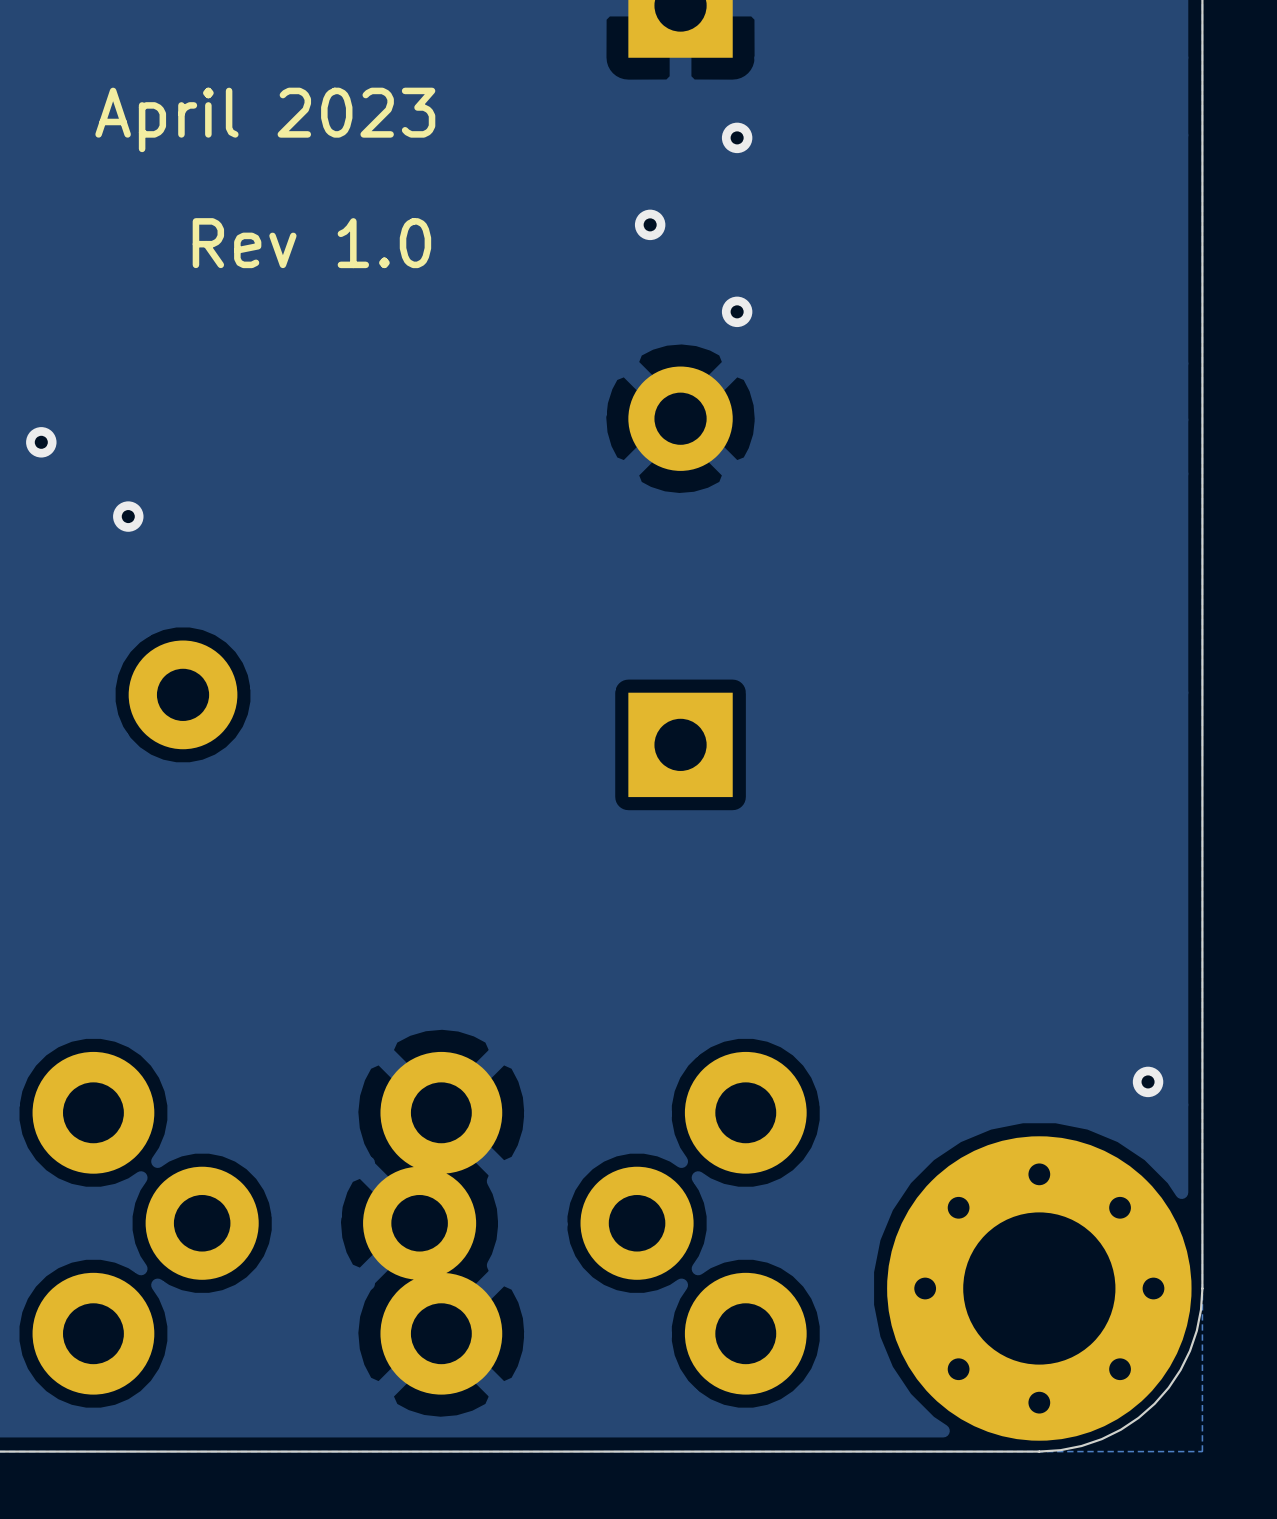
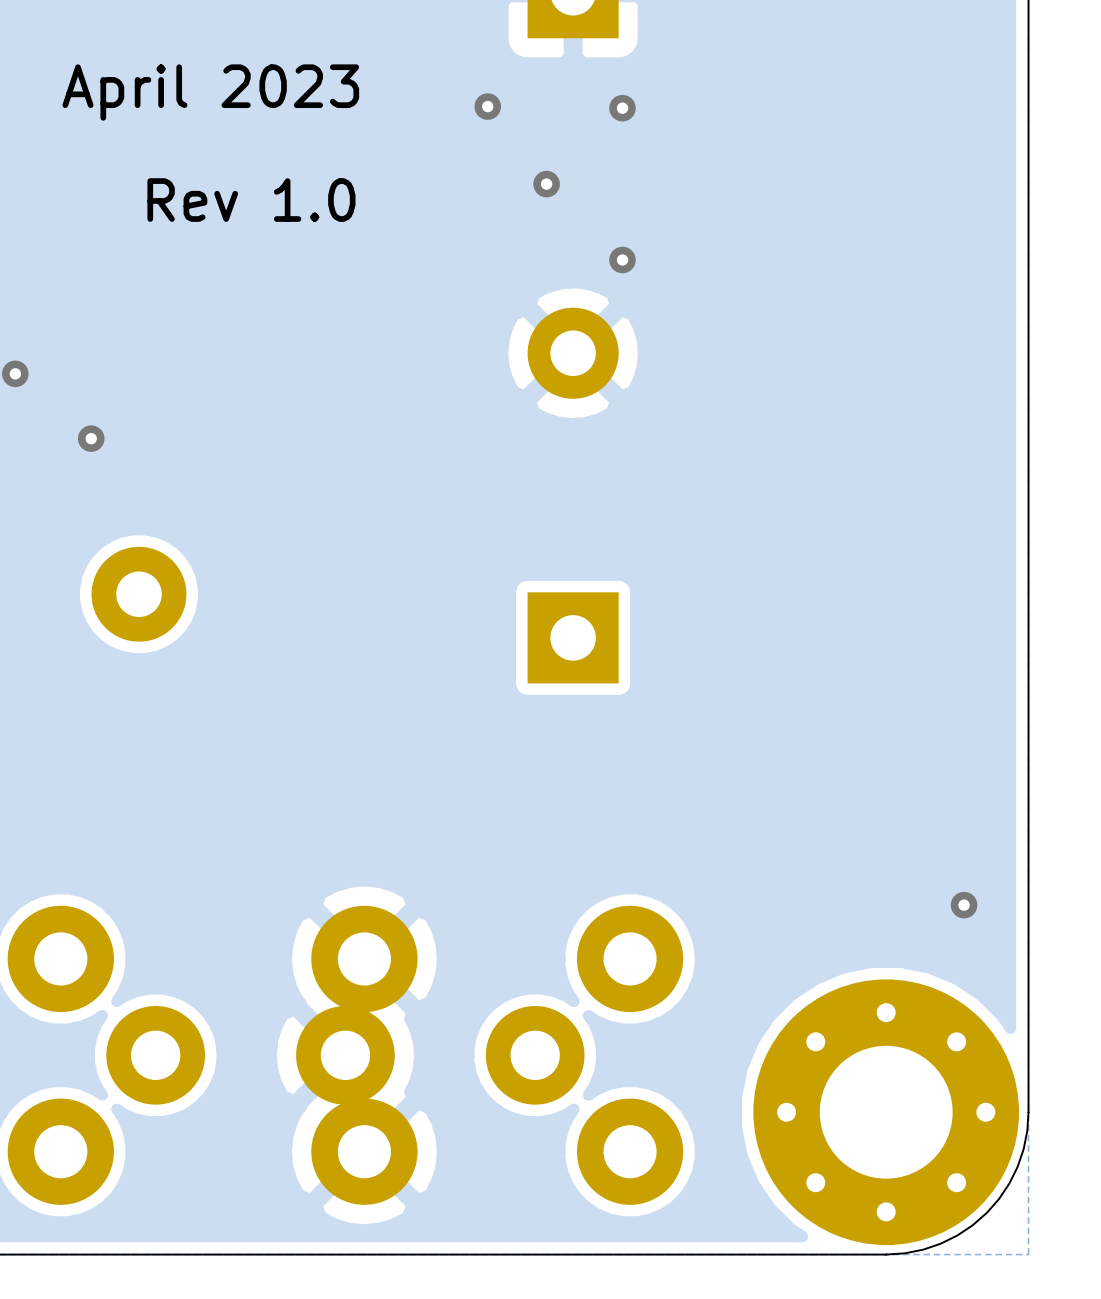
via: none -> (487, 106)
via position: (1148, 1081) -> (964, 905)

